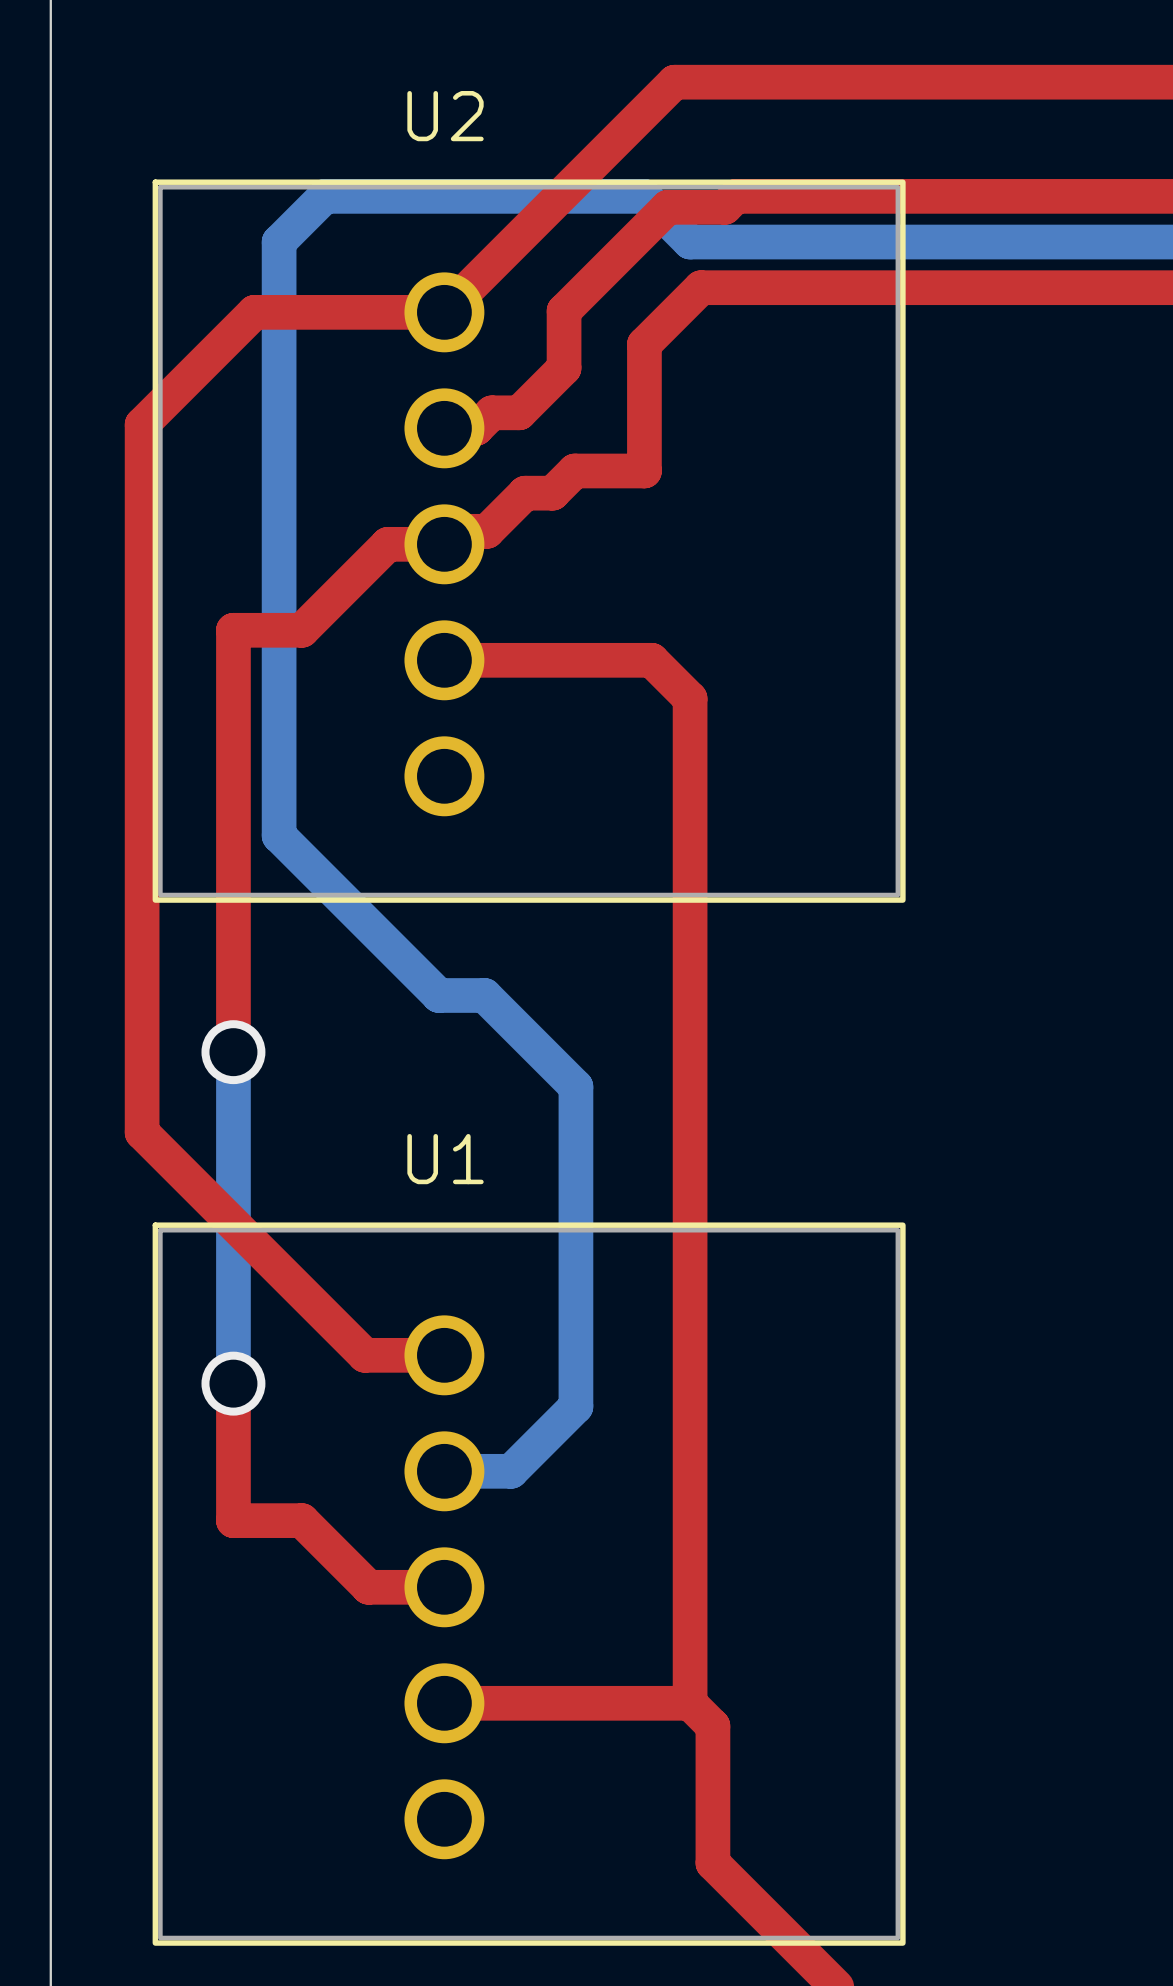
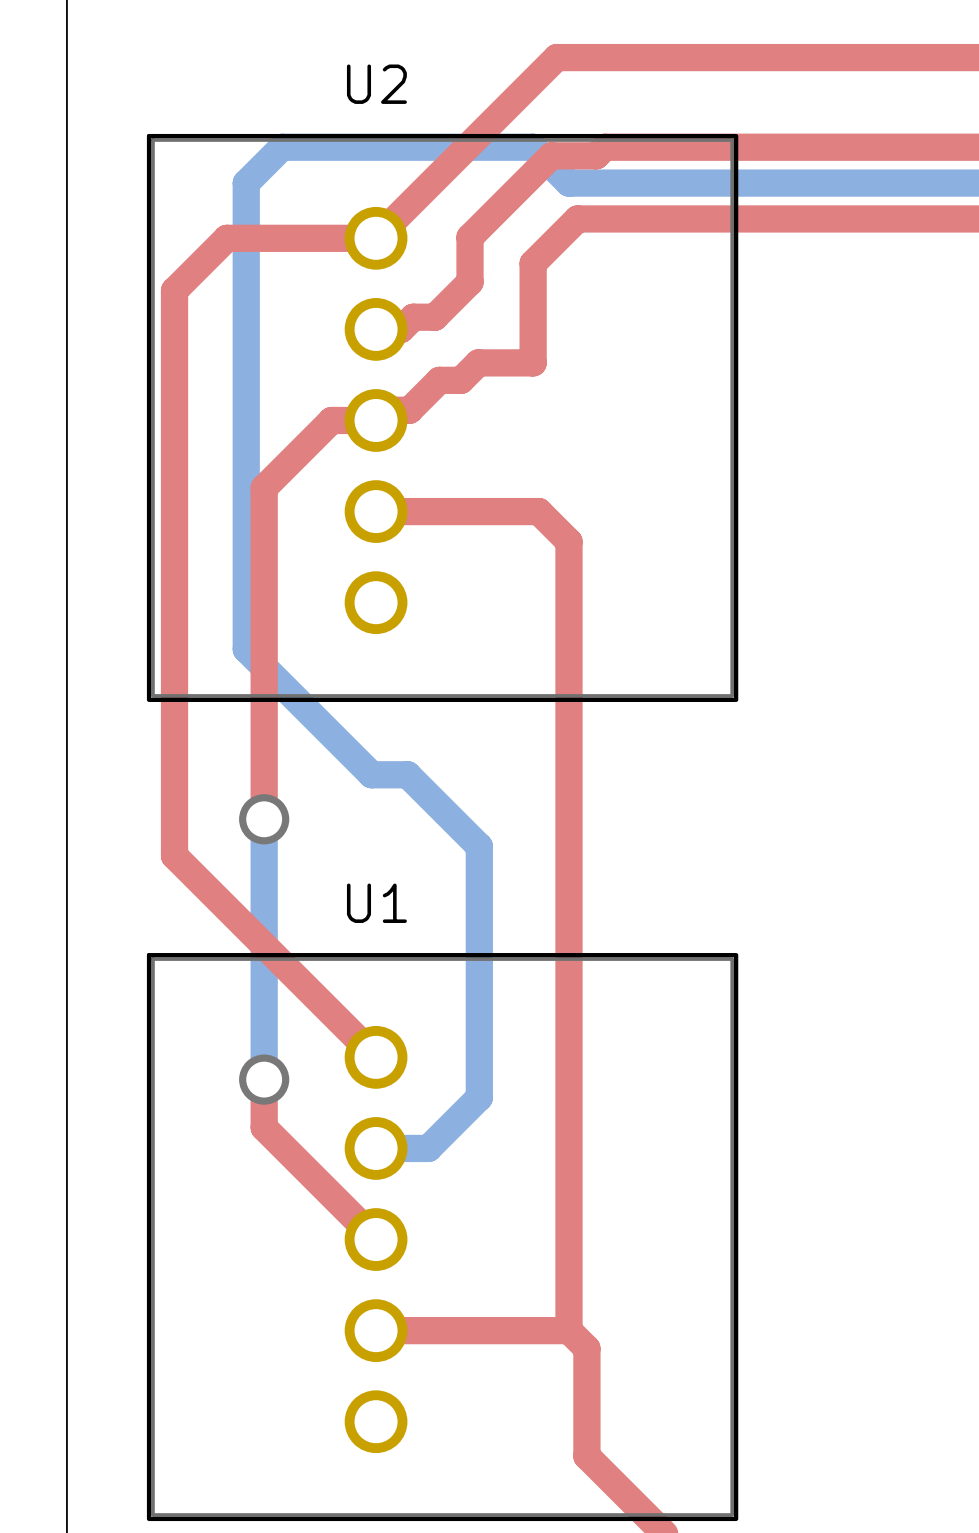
top track: (187, 379) (142, 424) (142, 1132) (364, 1355) (444, 1355) -> (174, 290) (174, 855) (376, 1057)
top track: (301, 630) (233, 630) (233, 1052) -> (264, 487) (264, 819)
bottom track: (233, 1052) (233, 1383) -> (264, 819) (264, 1079)
via: (233, 1052) -> none
via: none -> (264, 819)
top track: (233, 1383) (233, 1520) (301, 1520) (368, 1587) (444, 1587) -> (264, 1079) (264, 1127) (376, 1239)
via: (233, 1383) -> none
via: none -> (264, 1079)

